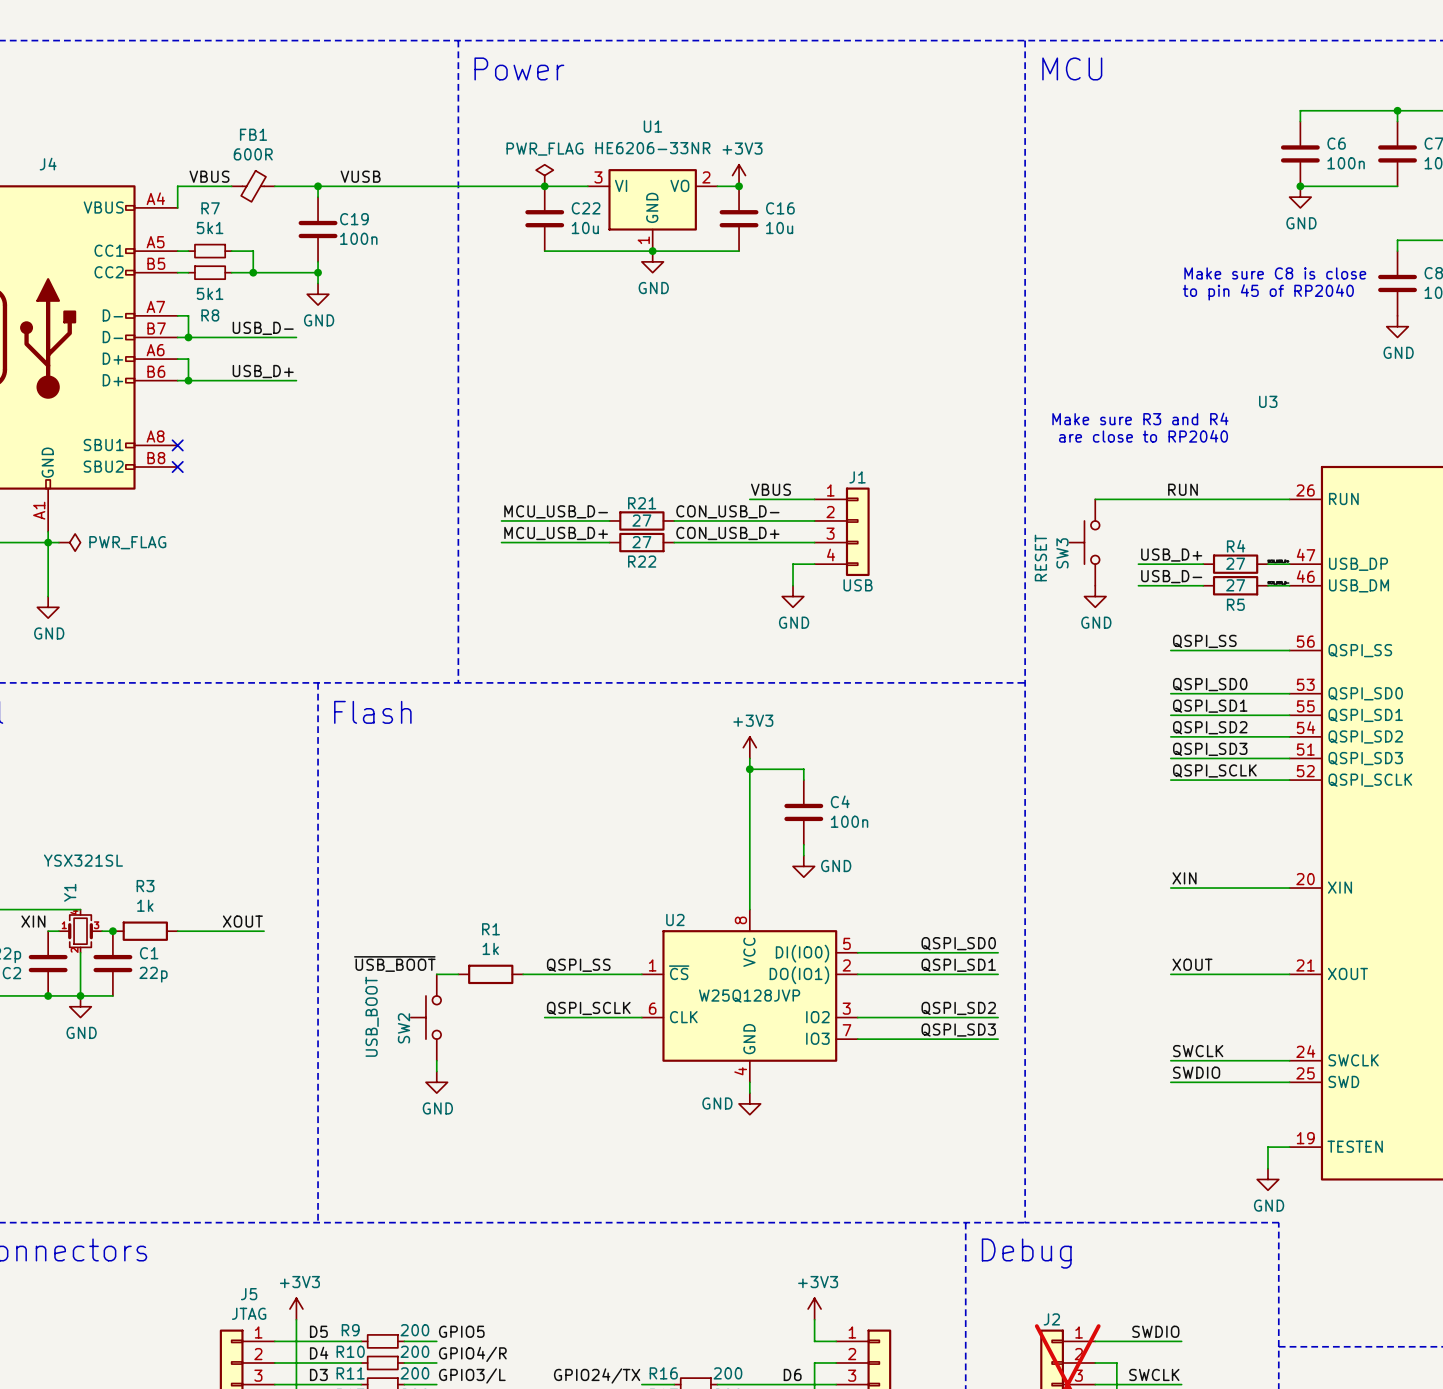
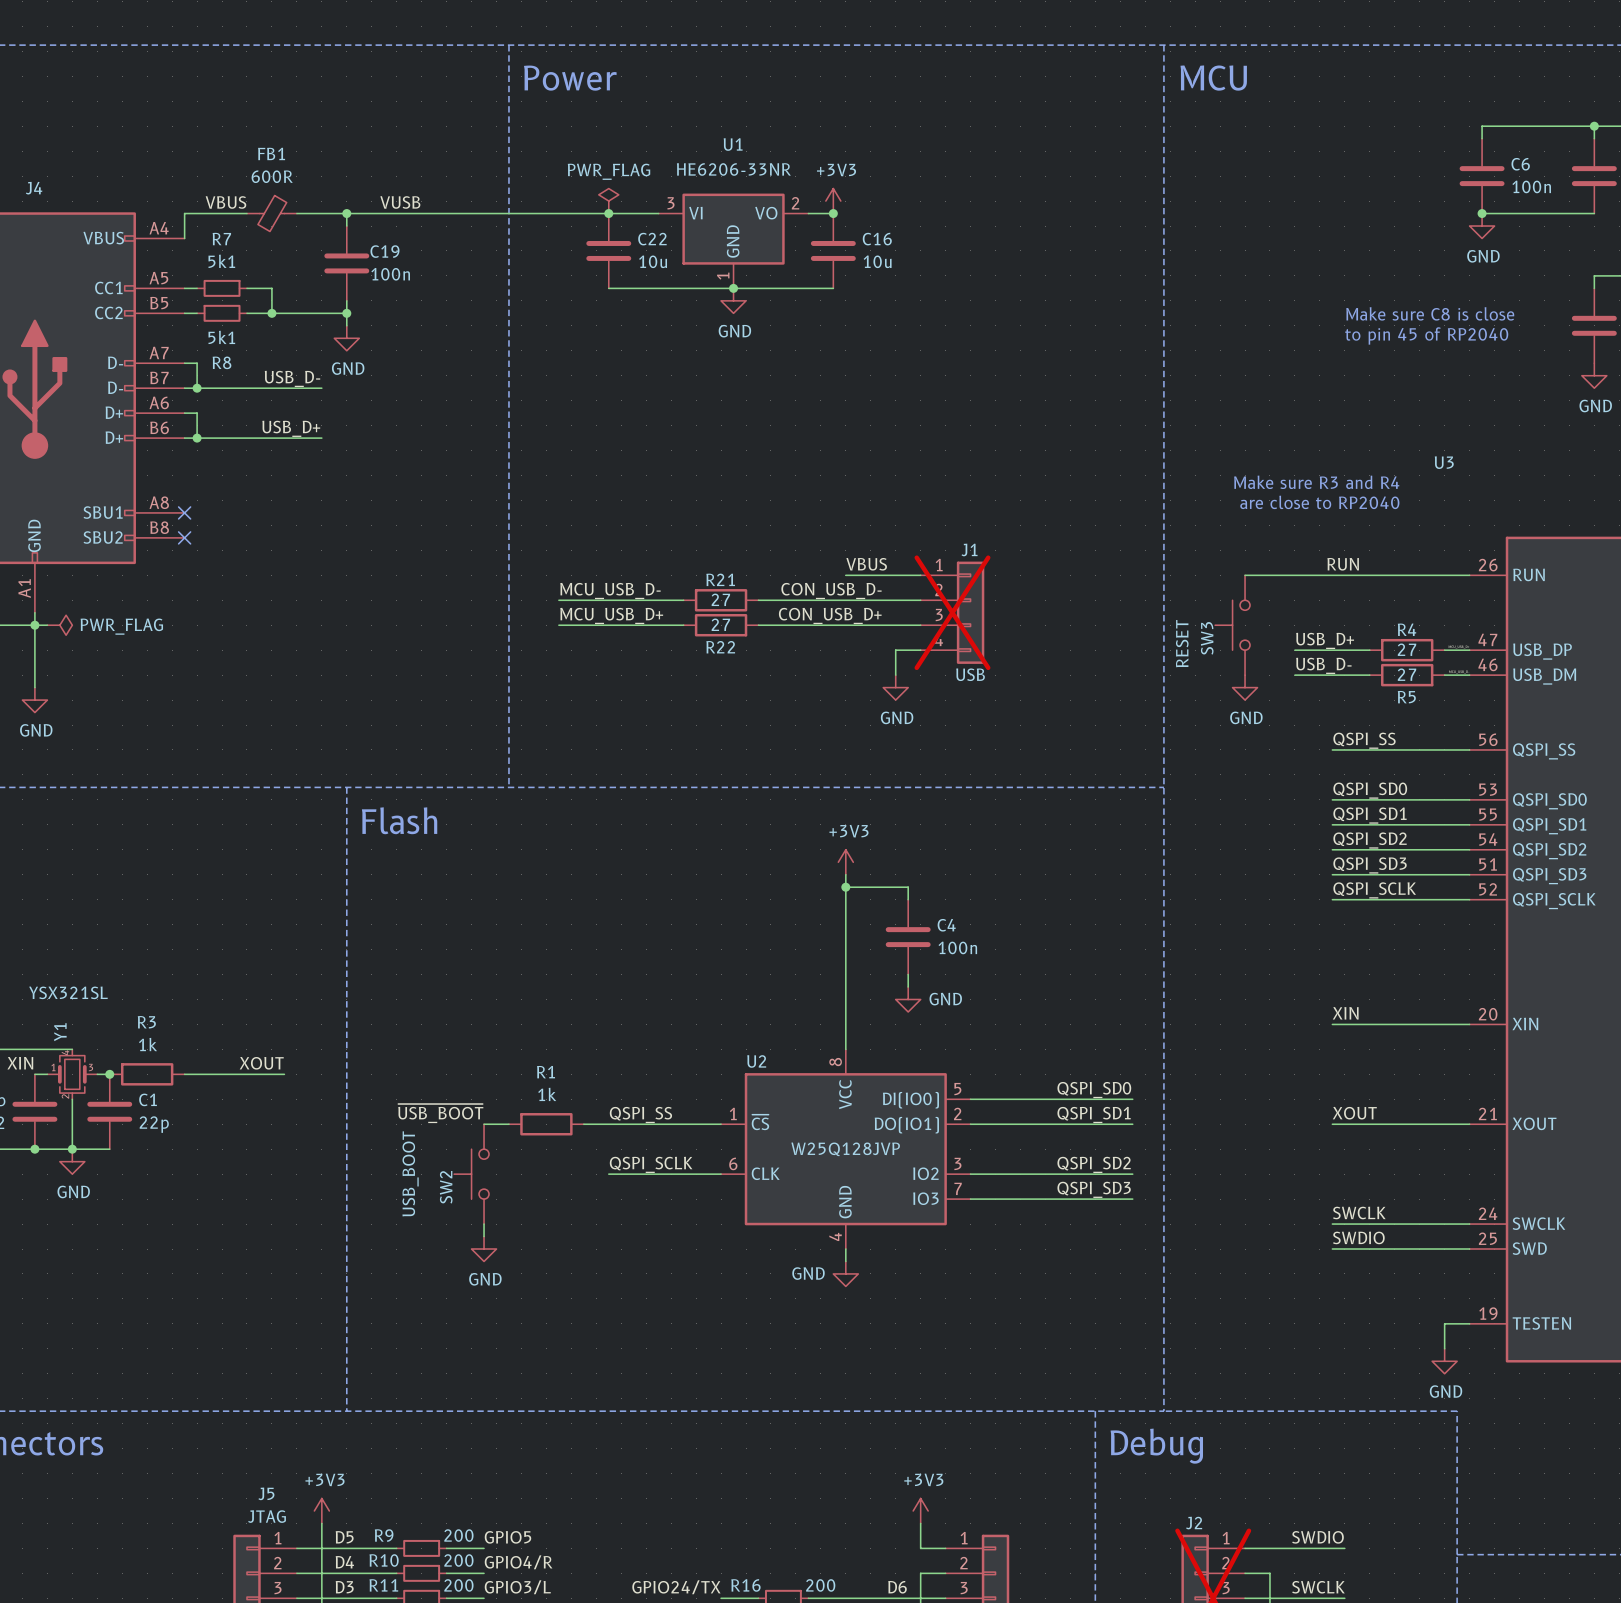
J1 do-not-place cross: none -> (952, 612)

